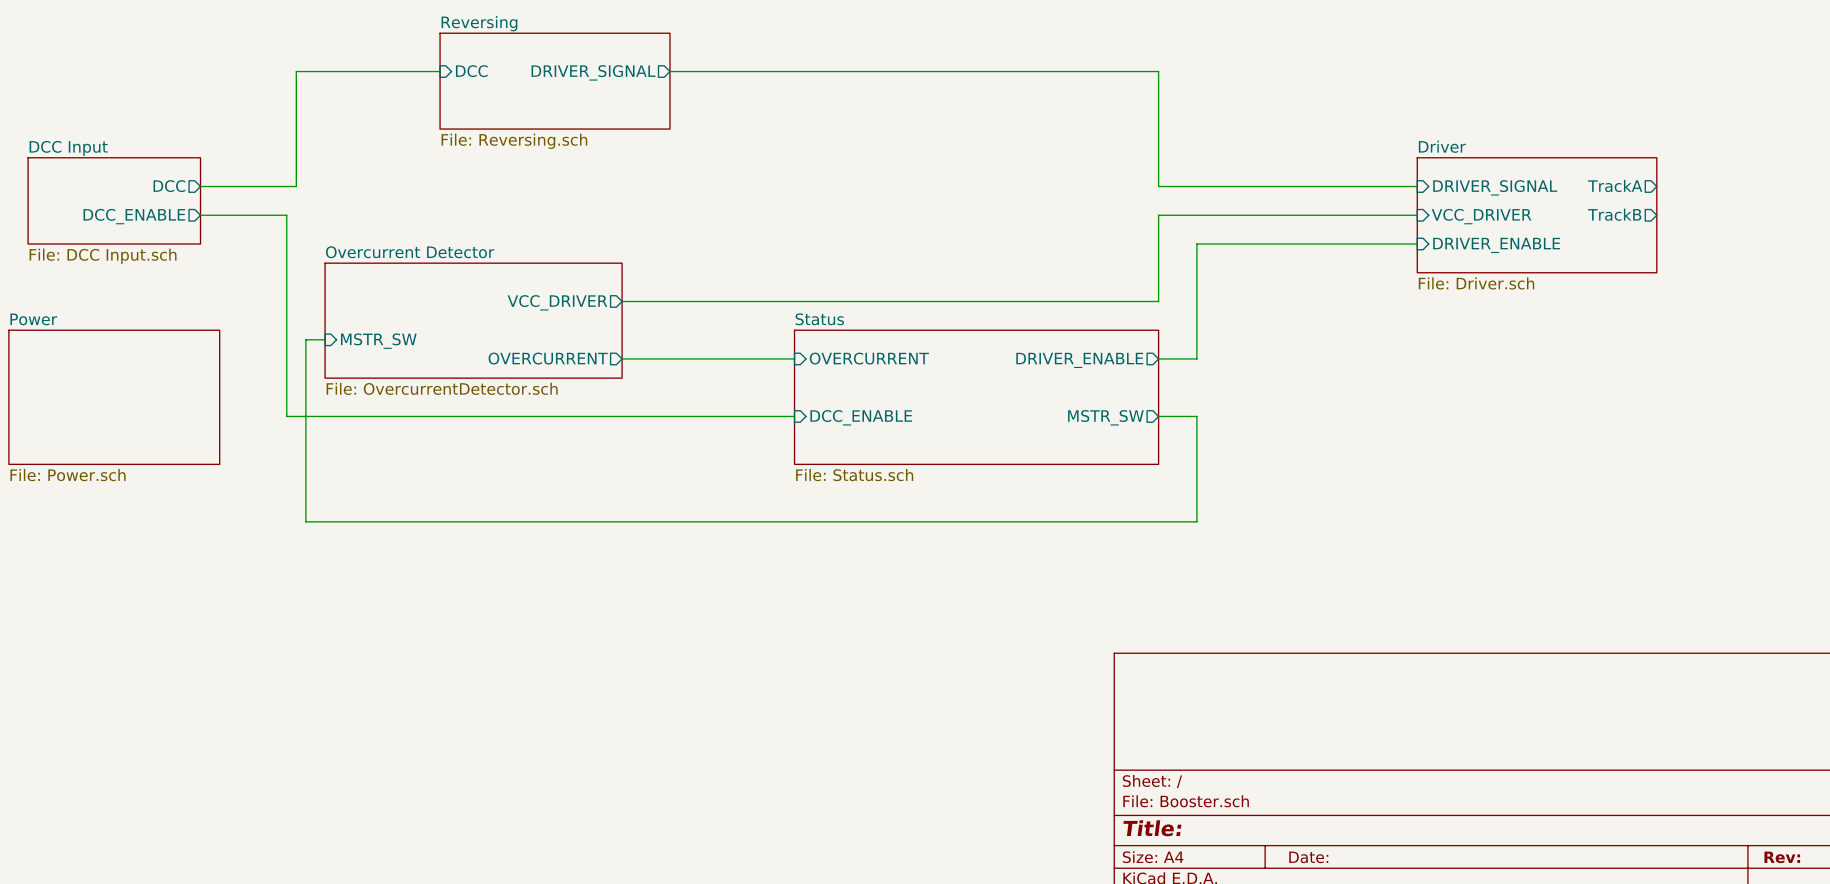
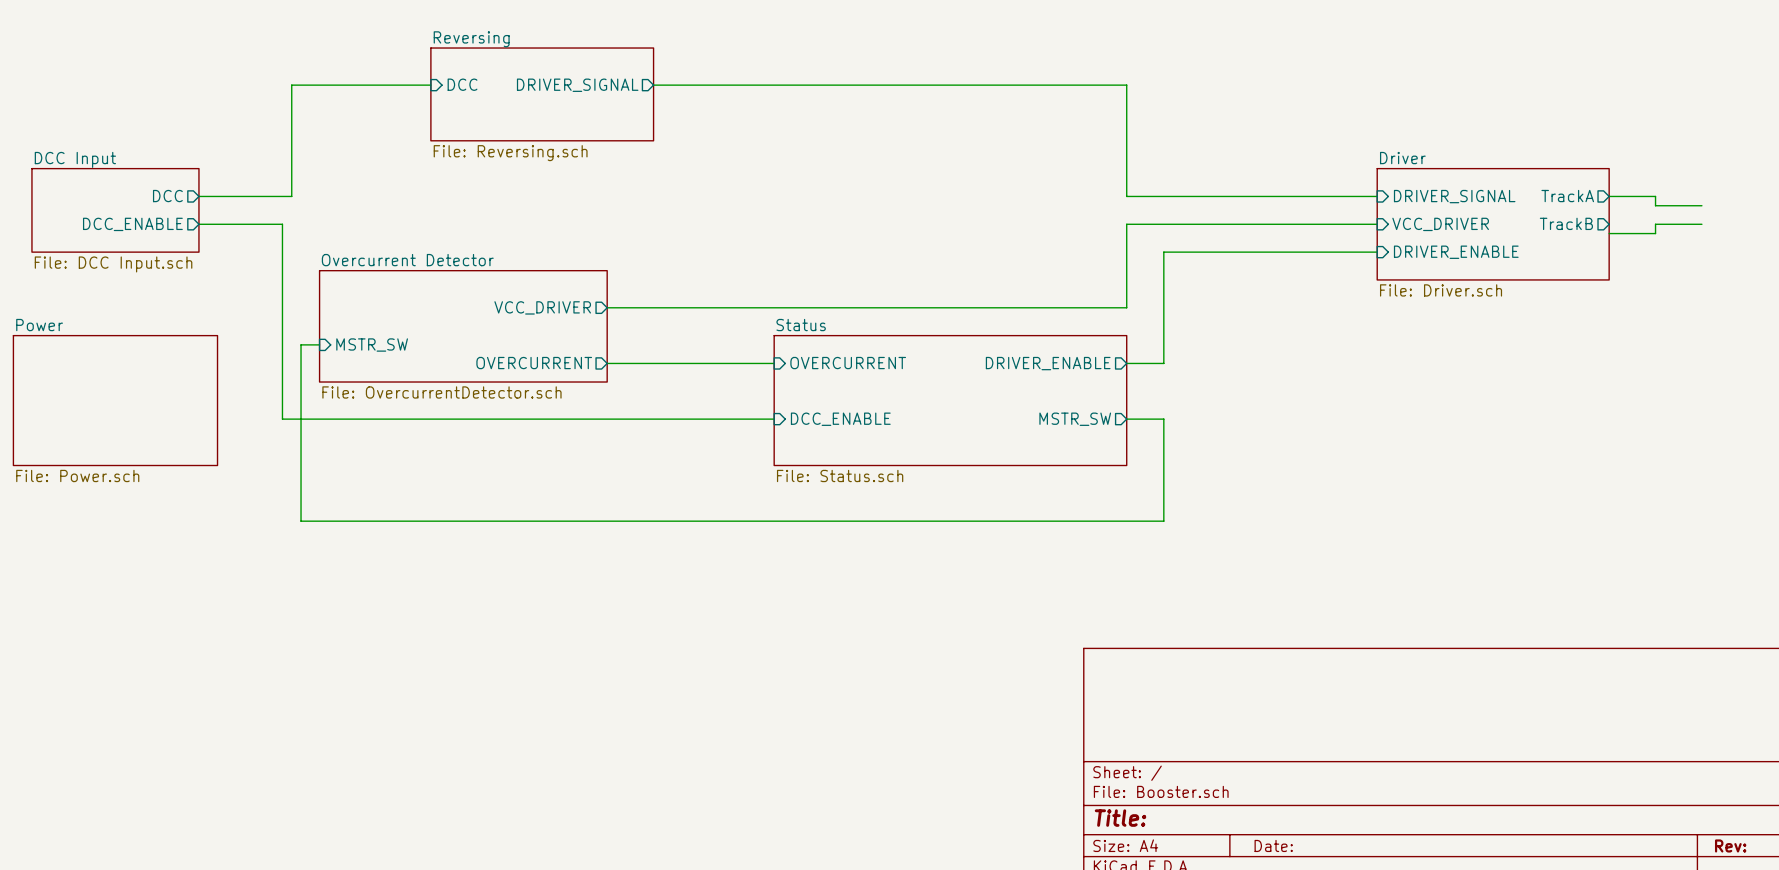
wire: none -> (1609, 196) (1655, 196) (1655, 205) (1701, 205)
wire: none -> (1701, 224) (1655, 224) (1655, 233) (1609, 233)

